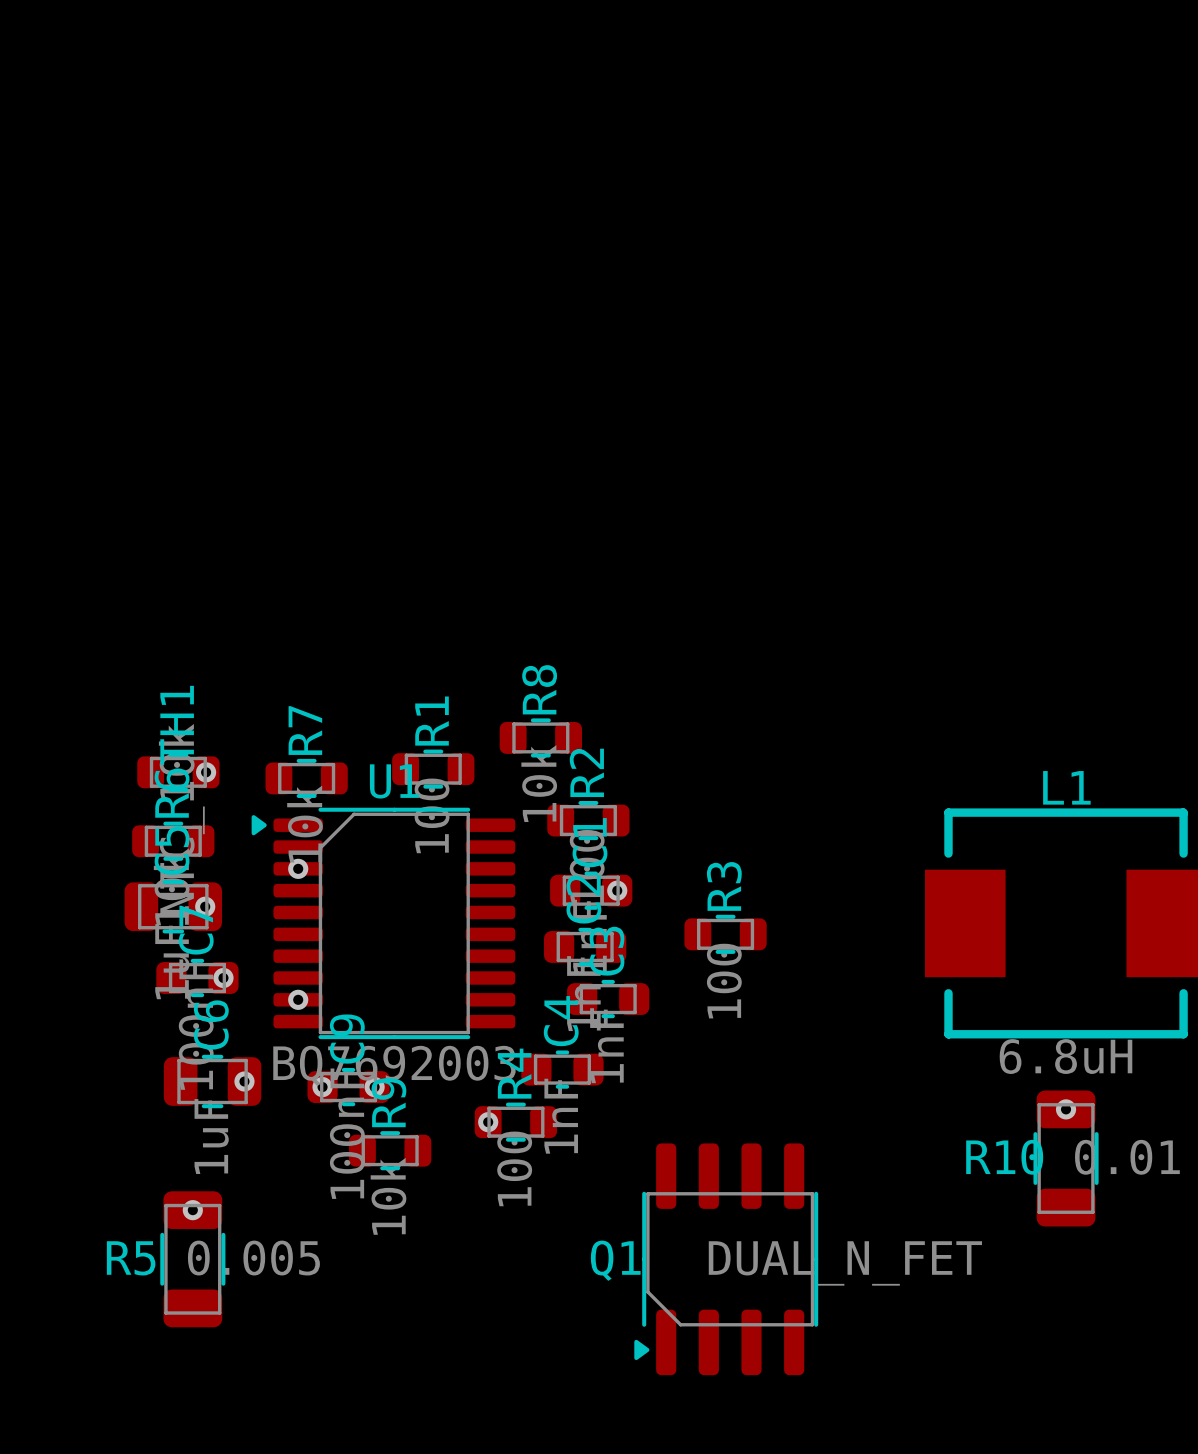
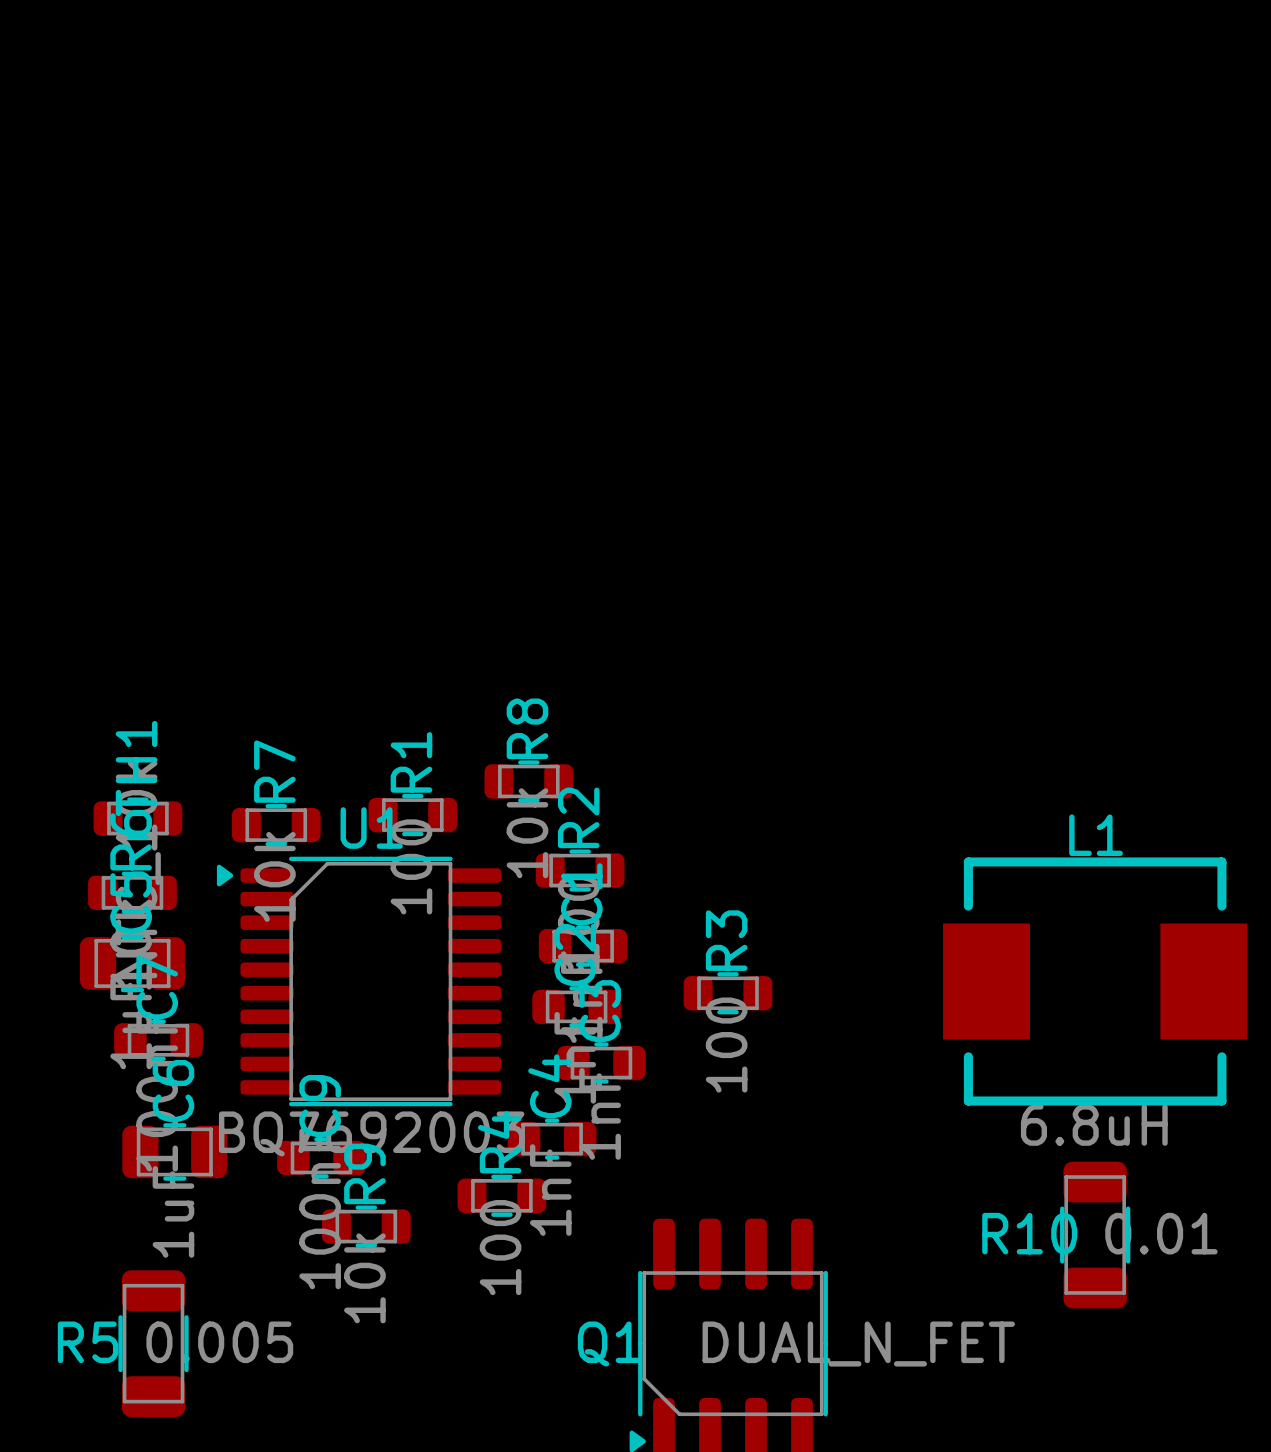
via: (206, 772) -> none
via: (298, 868) -> none
via: (617, 890) -> none
via: (205, 906) -> none
via: (223, 978) -> none
via: (298, 999) -> none
via: (244, 1081) -> none
via: (322, 1087) -> none
via: (374, 1087) -> none
via: (1066, 1109) -> none
via: (488, 1122) -> none
via: (192, 1210) -> none

